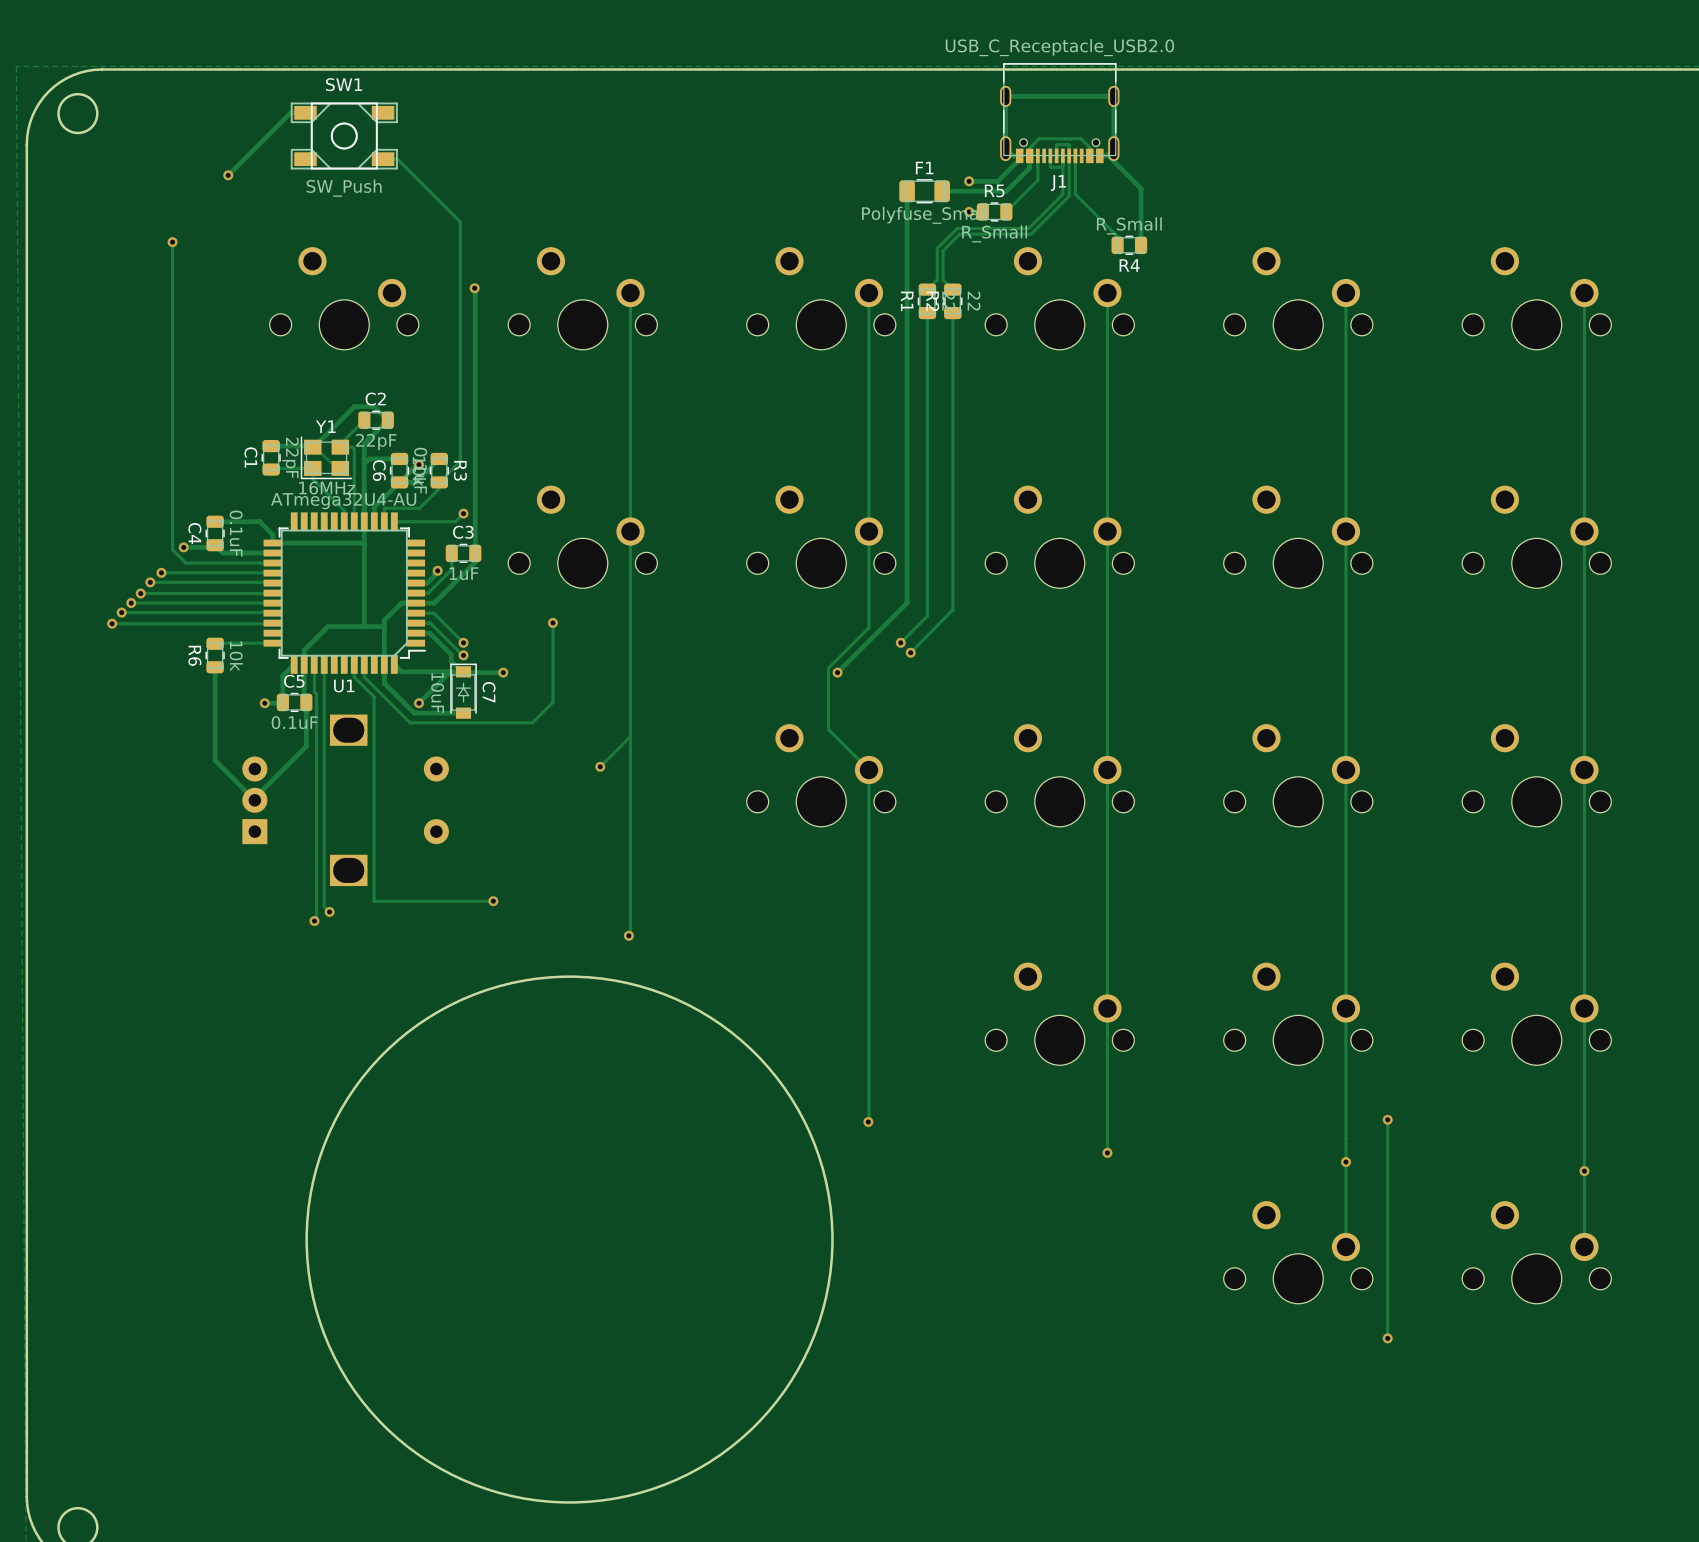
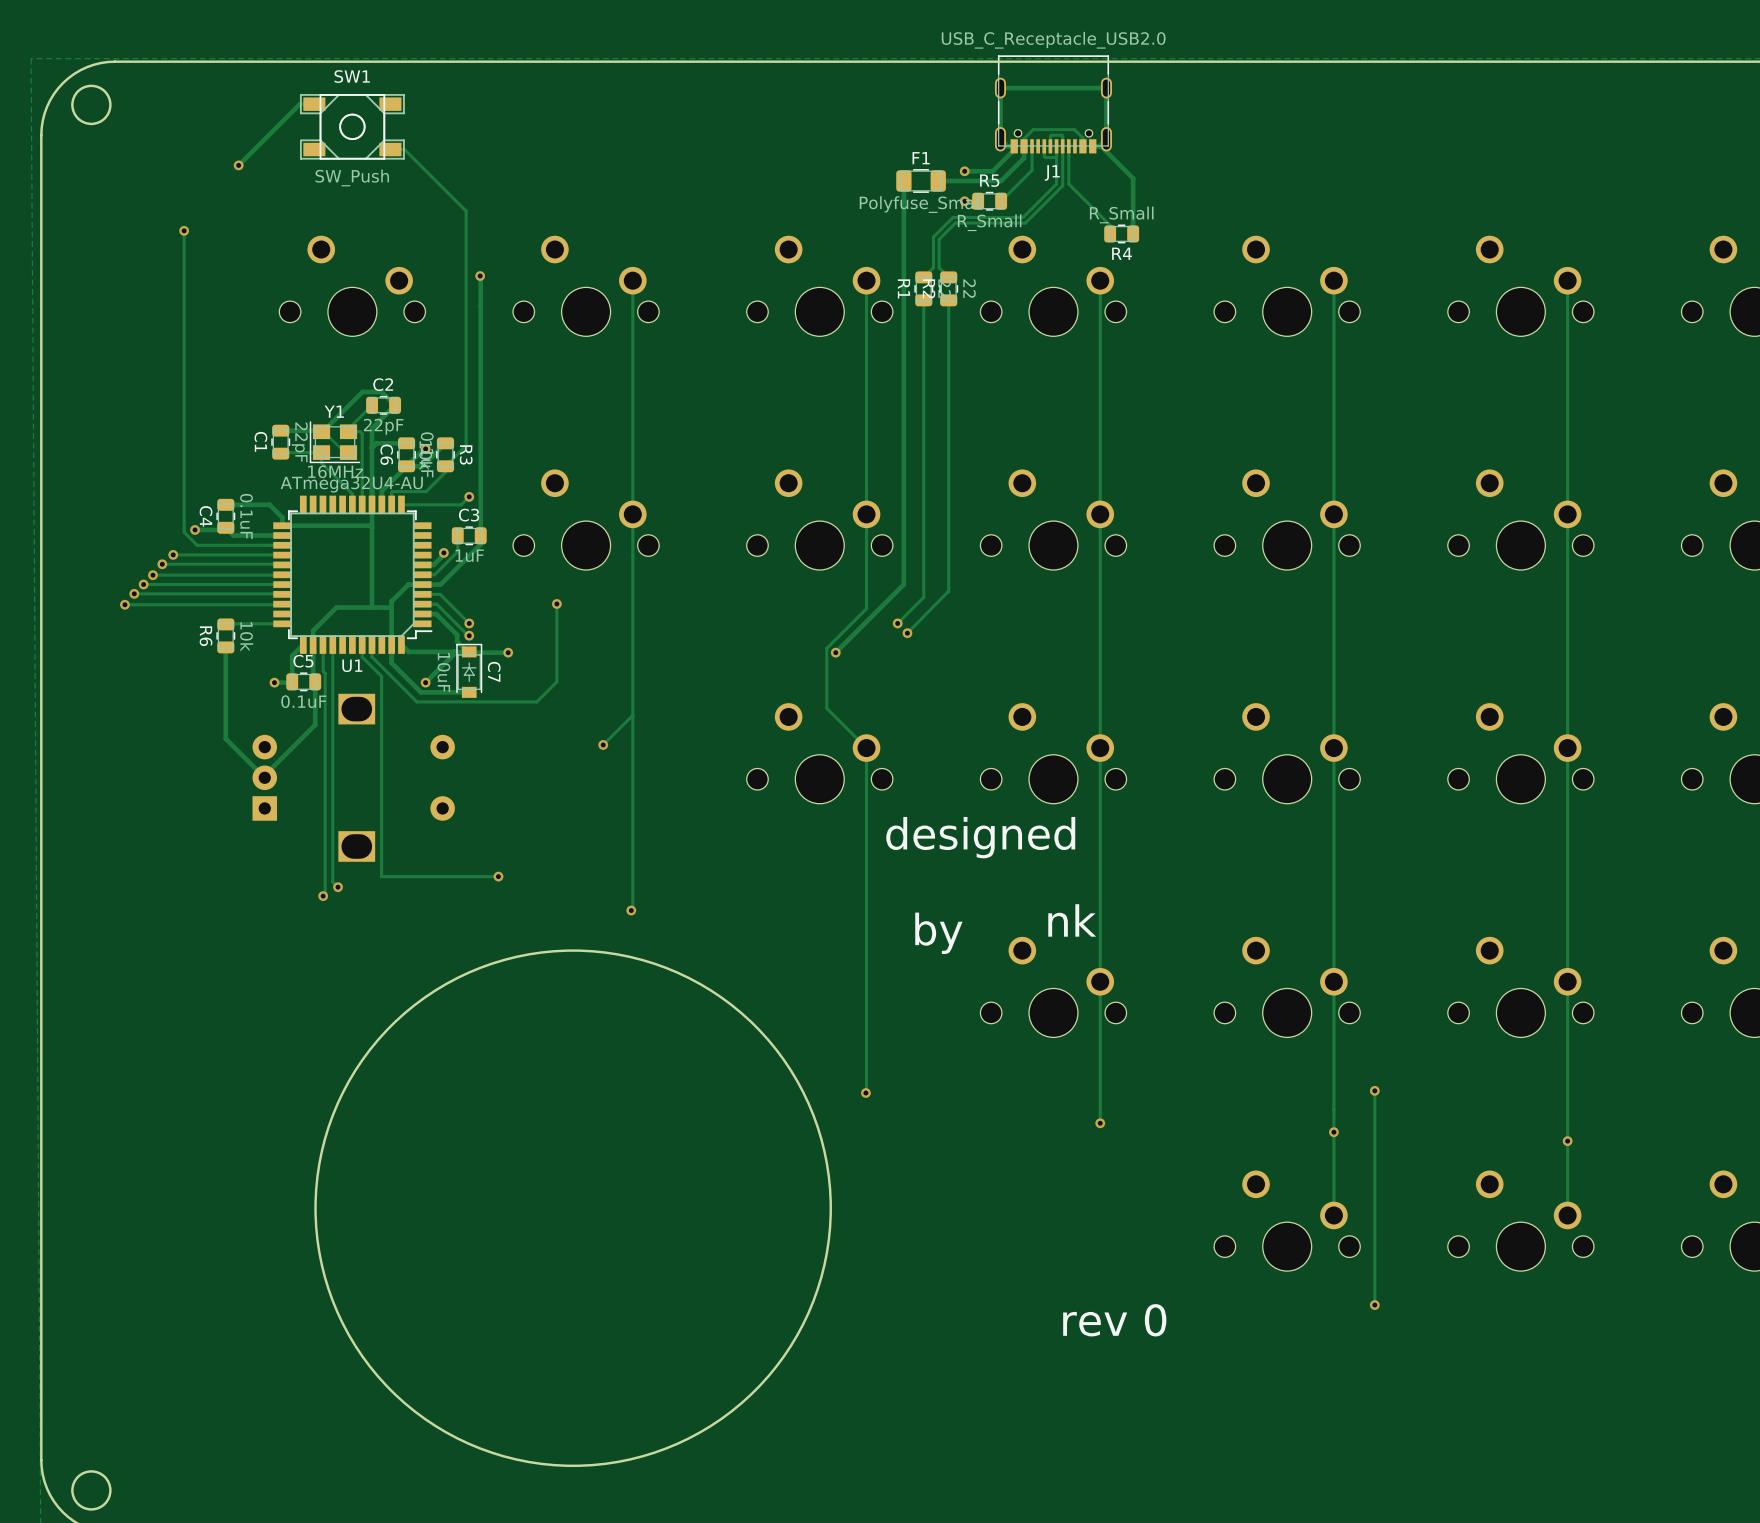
text: none -> designed (980, 837)
text: none -> nk (1072, 920)
text: none -> by (938, 933)
text: none -> rev 0 (1114, 1320)

